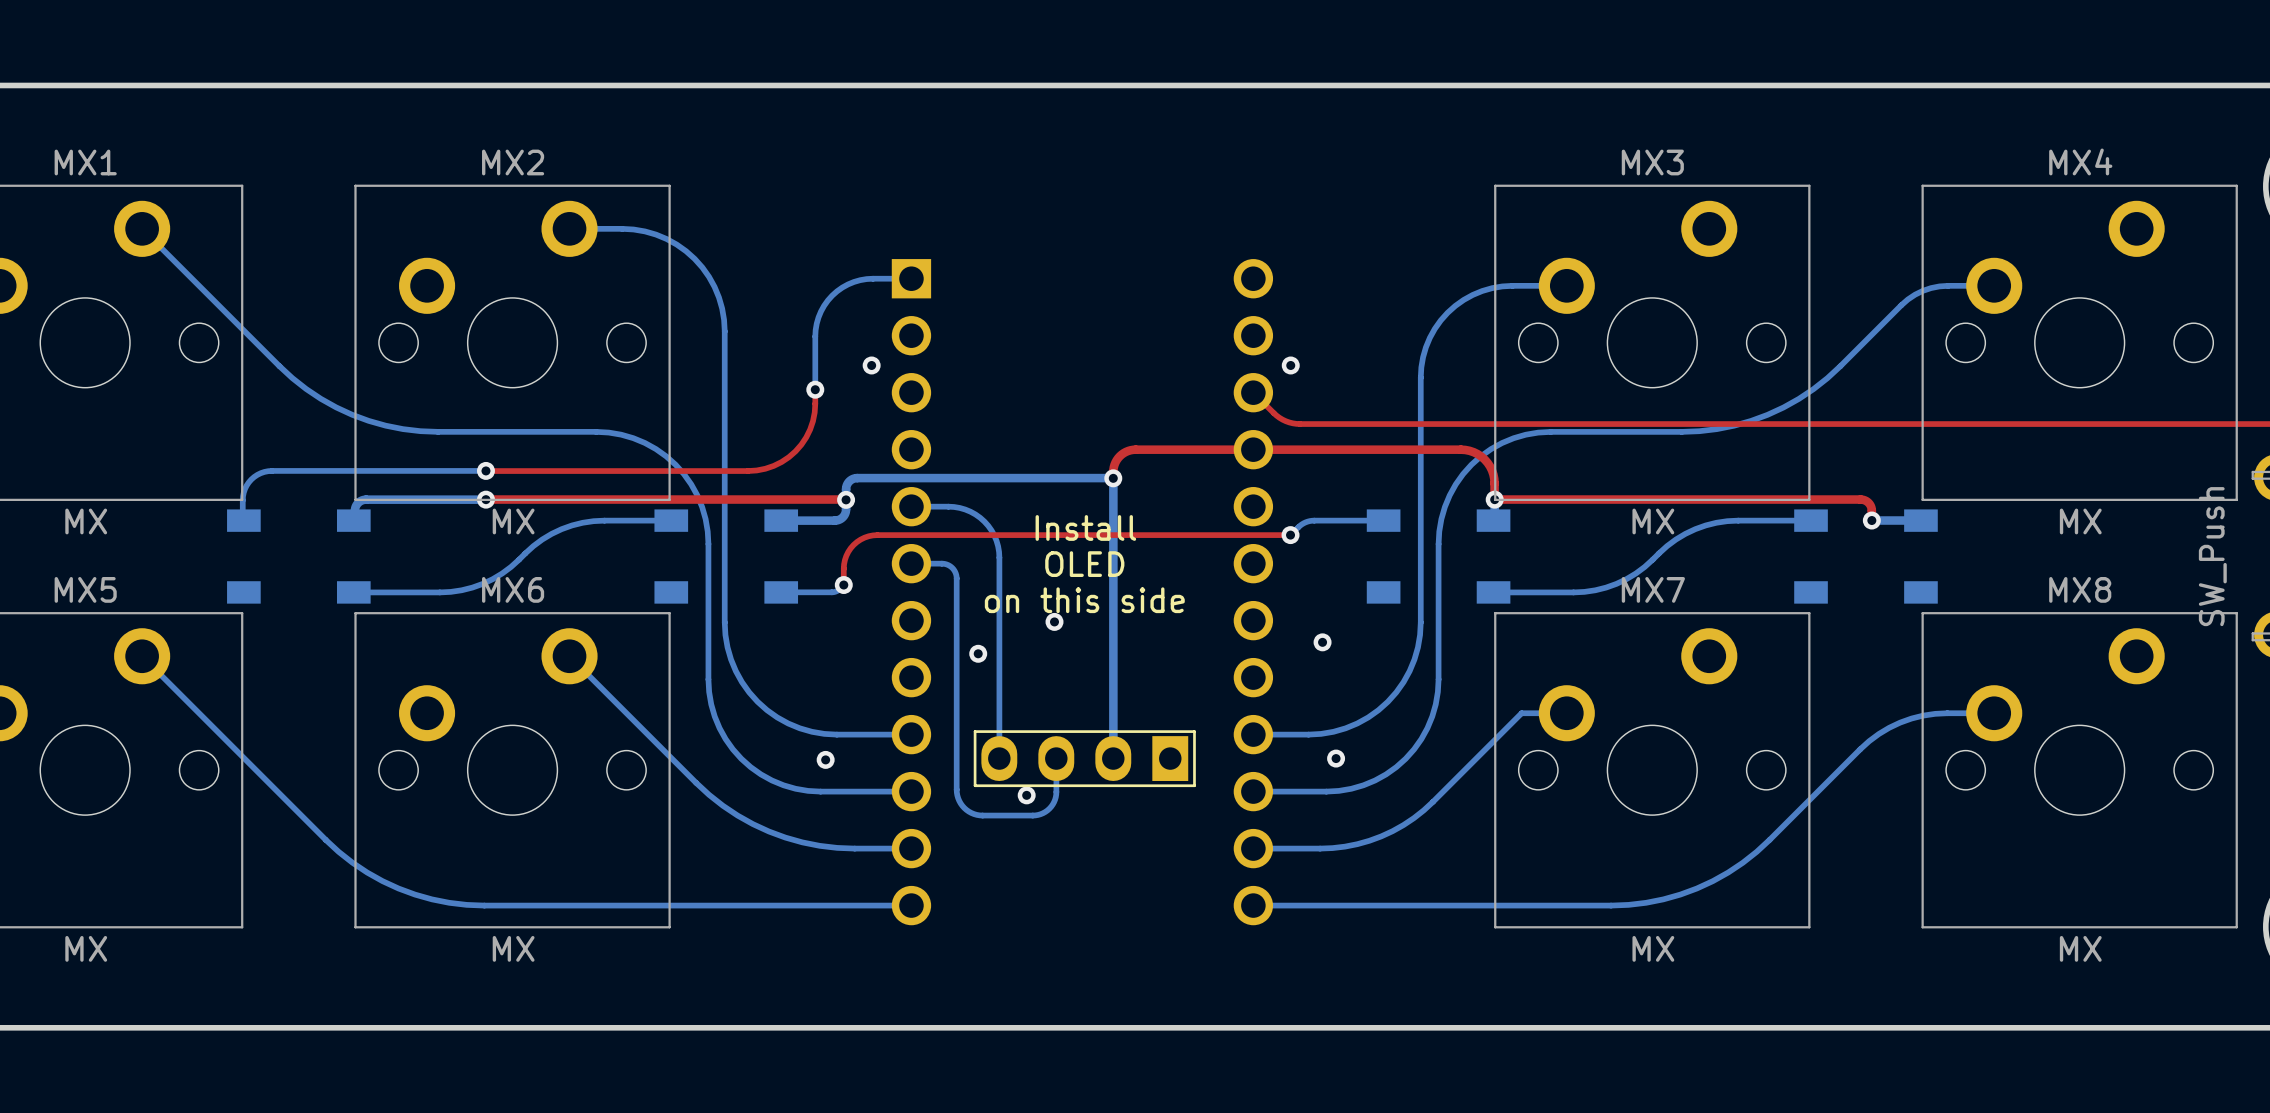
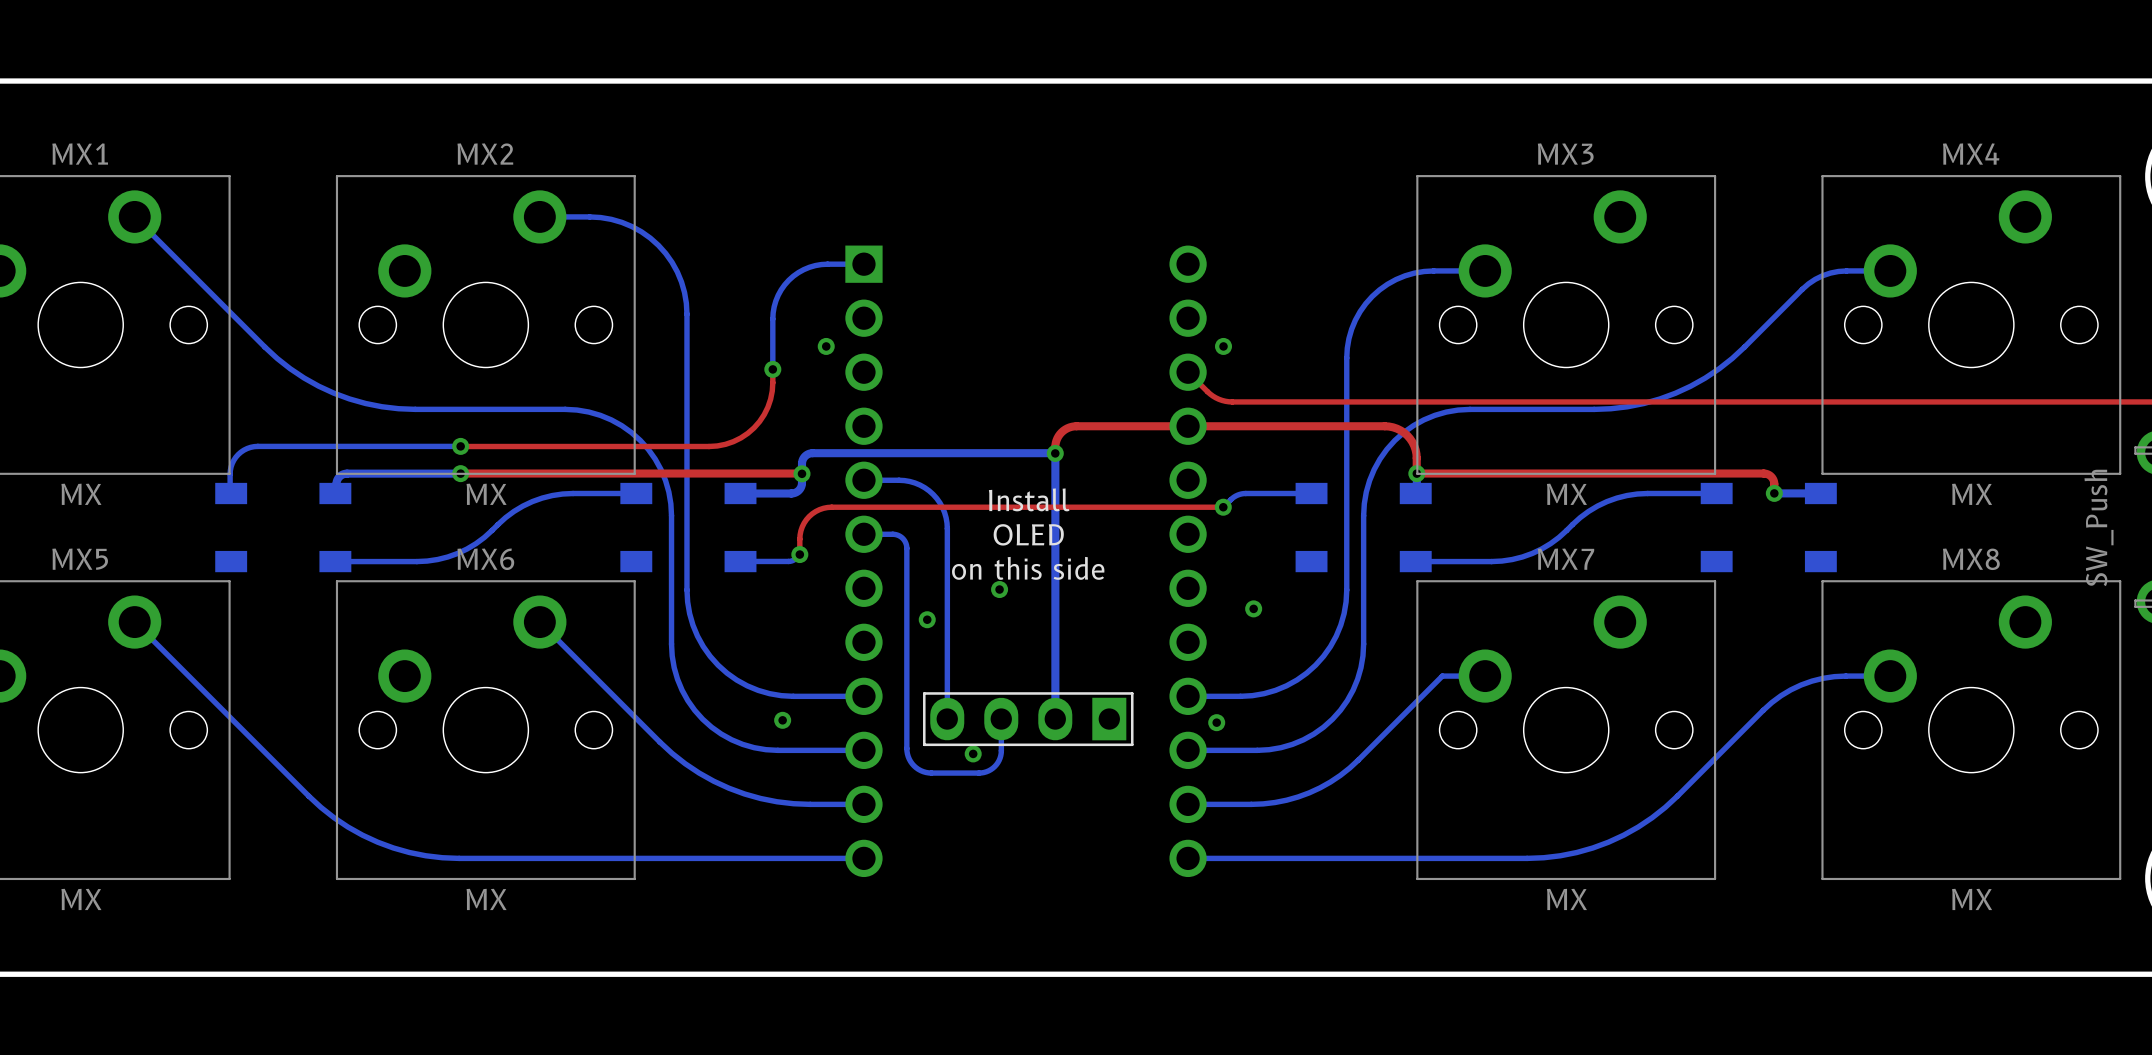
via position: (1336, 758) -> (1216, 722)

